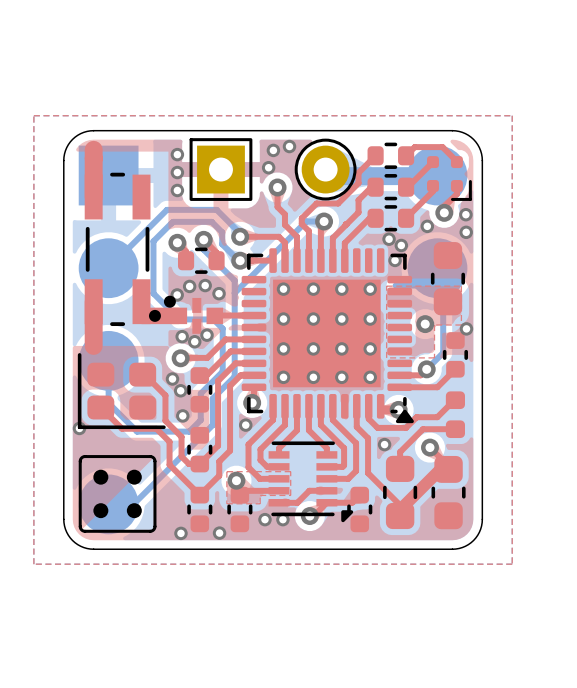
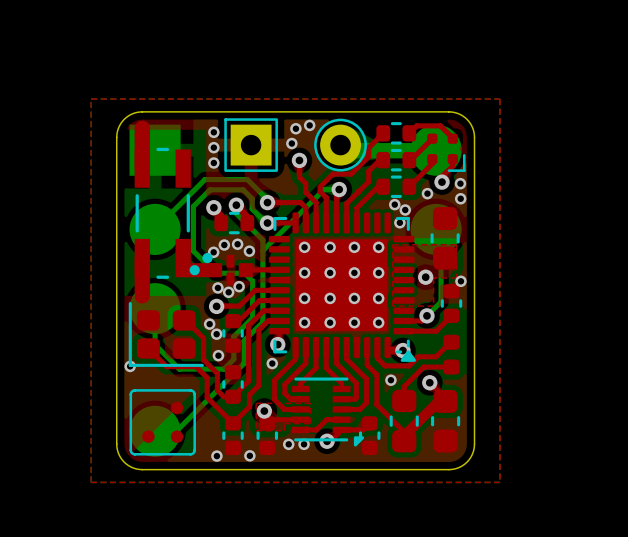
bottom track: (395, 285) (420, 285) -> none
drawing: [93, 469, 109, 485] -> none
drawing shape: [126, 469, 142, 485] -> [170, 401, 184, 415]
drawing shape: [93, 503, 109, 519] -> [142, 430, 155, 443]
drawing shape: [126, 503, 142, 519] -> [170, 430, 184, 443]

